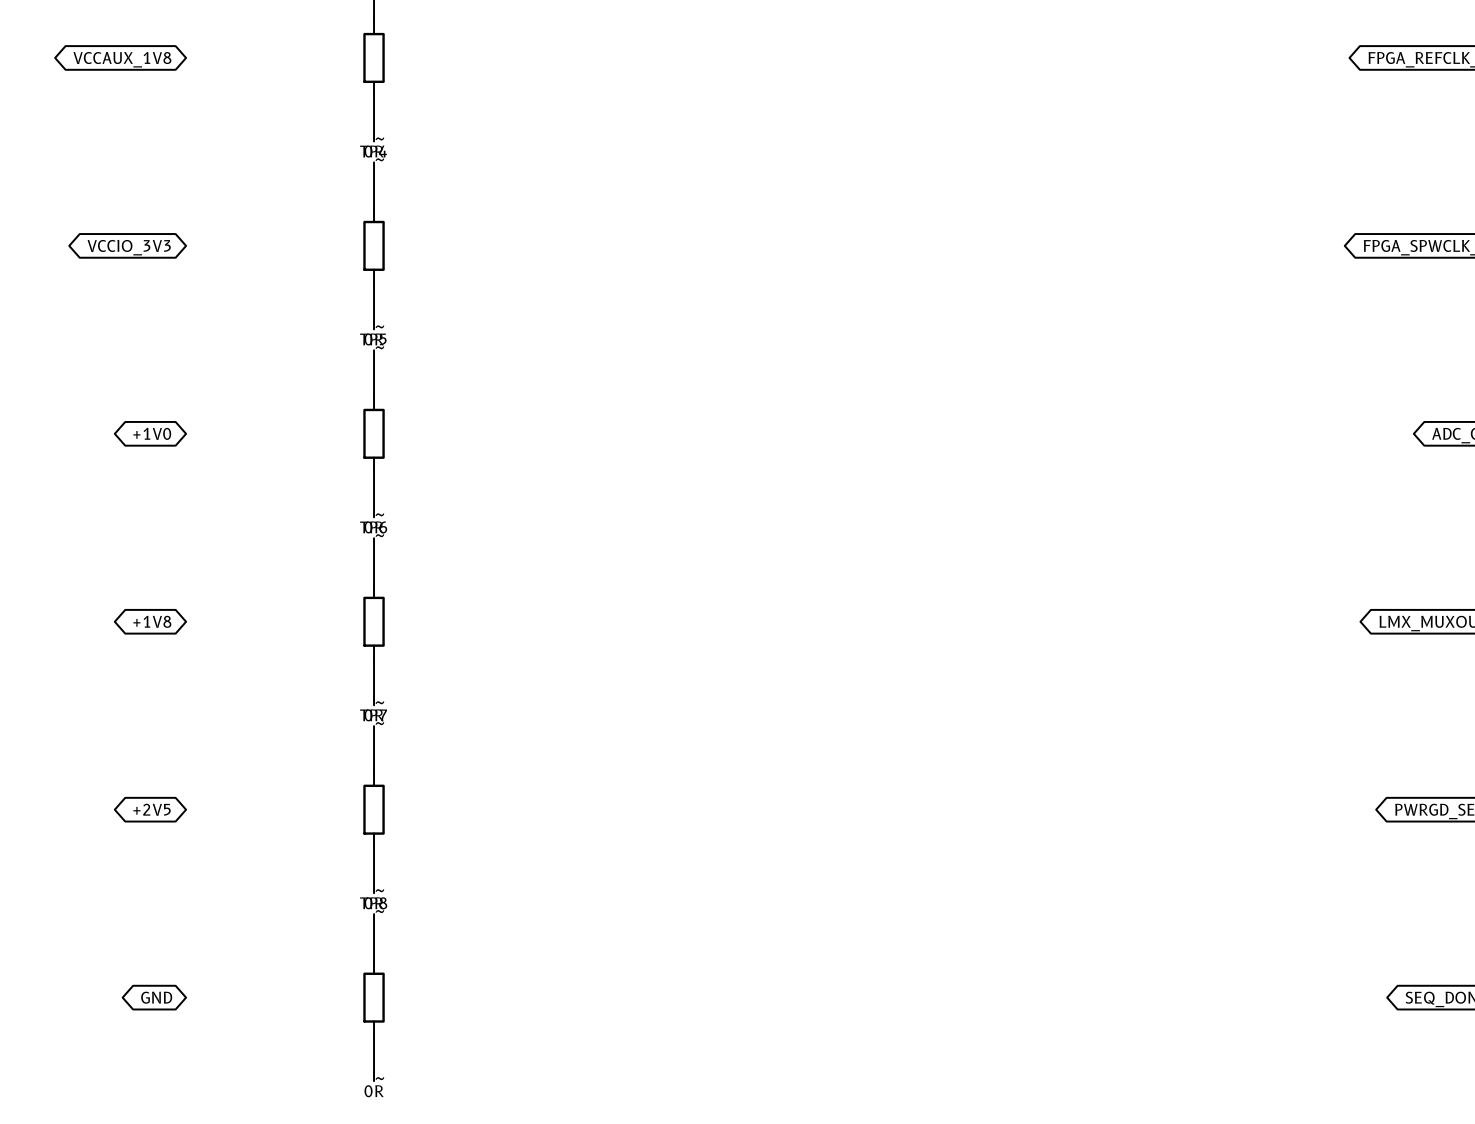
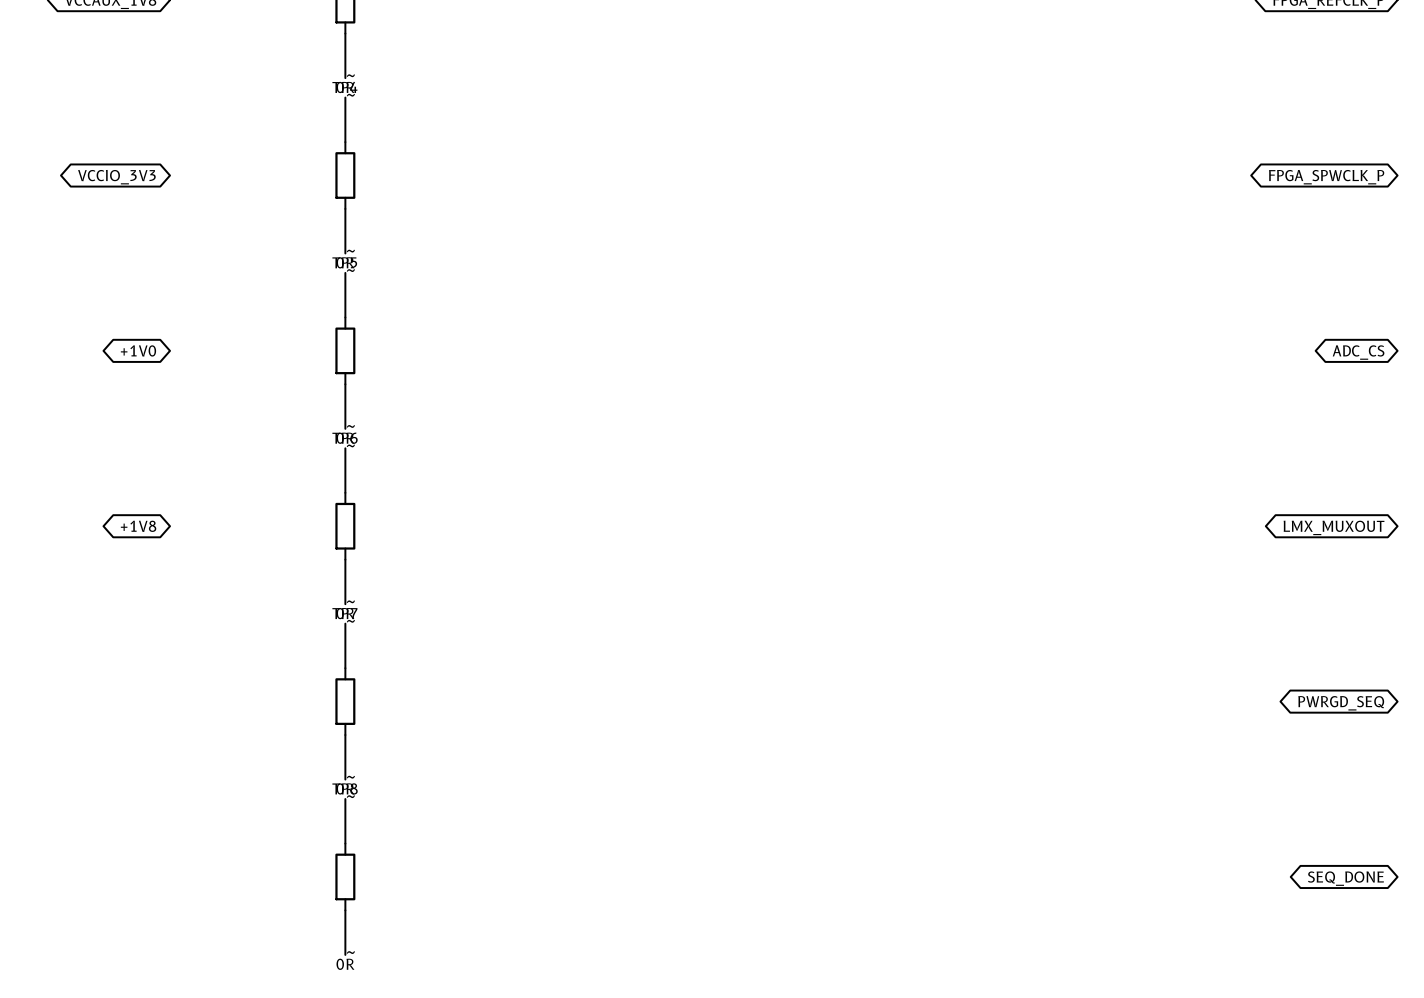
global label: +2V5 (152, 809) -> none
global label: GND (156, 997) -> none

